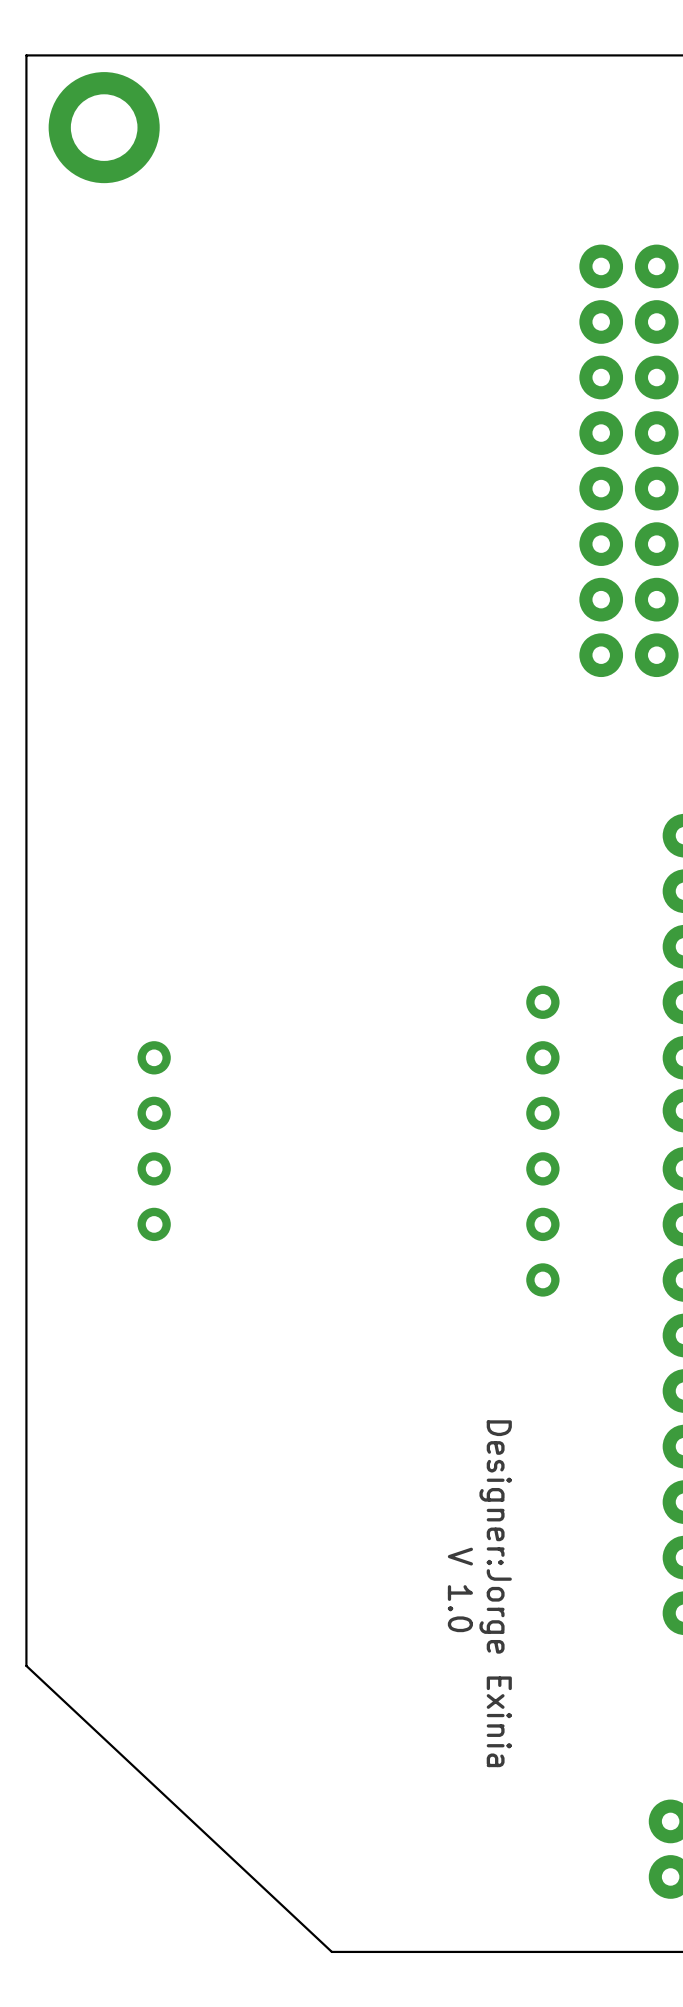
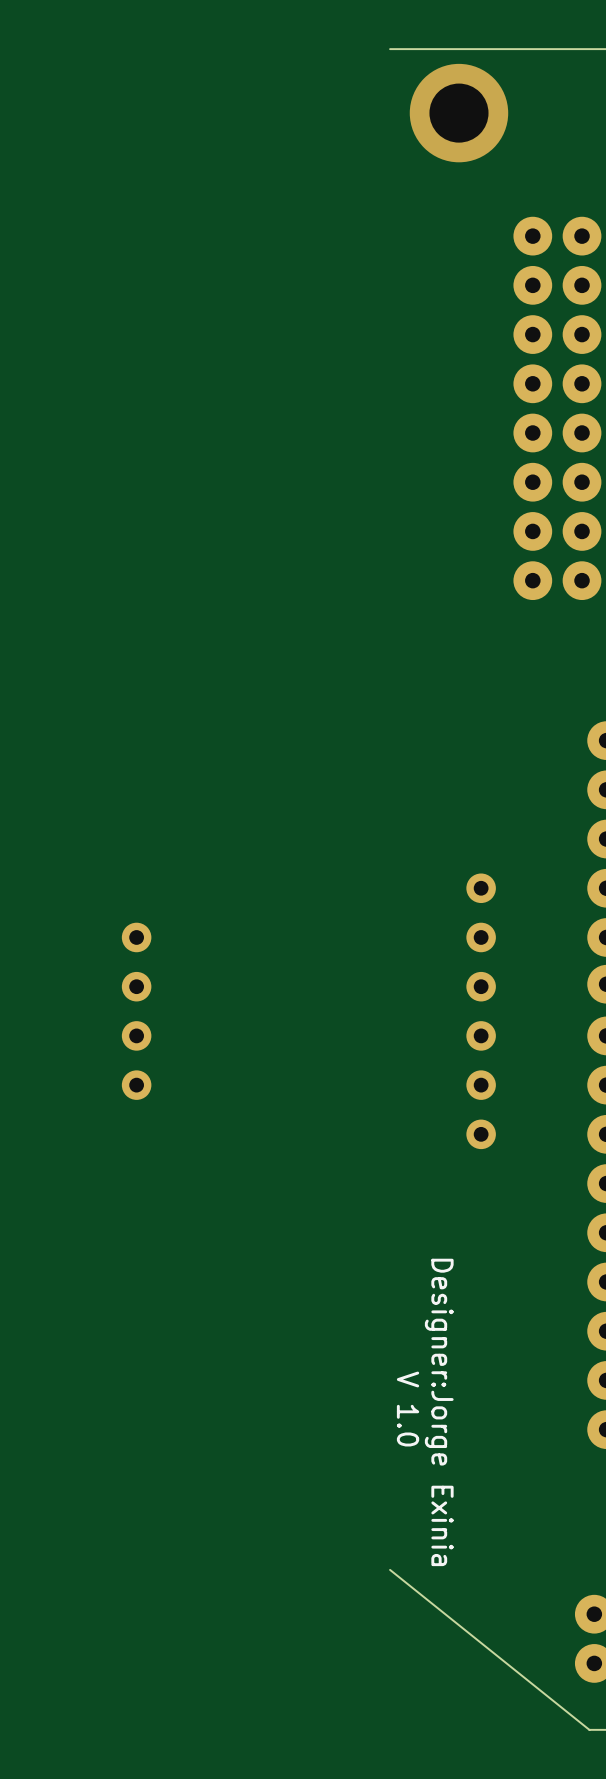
board edge: (440, 55) (26, 55) (26, 1665) (331, 1951) (665, 1951) -> (390, 1569) (589, 1729)
via: (104, 127) -> none
via: none -> (458, 113)

